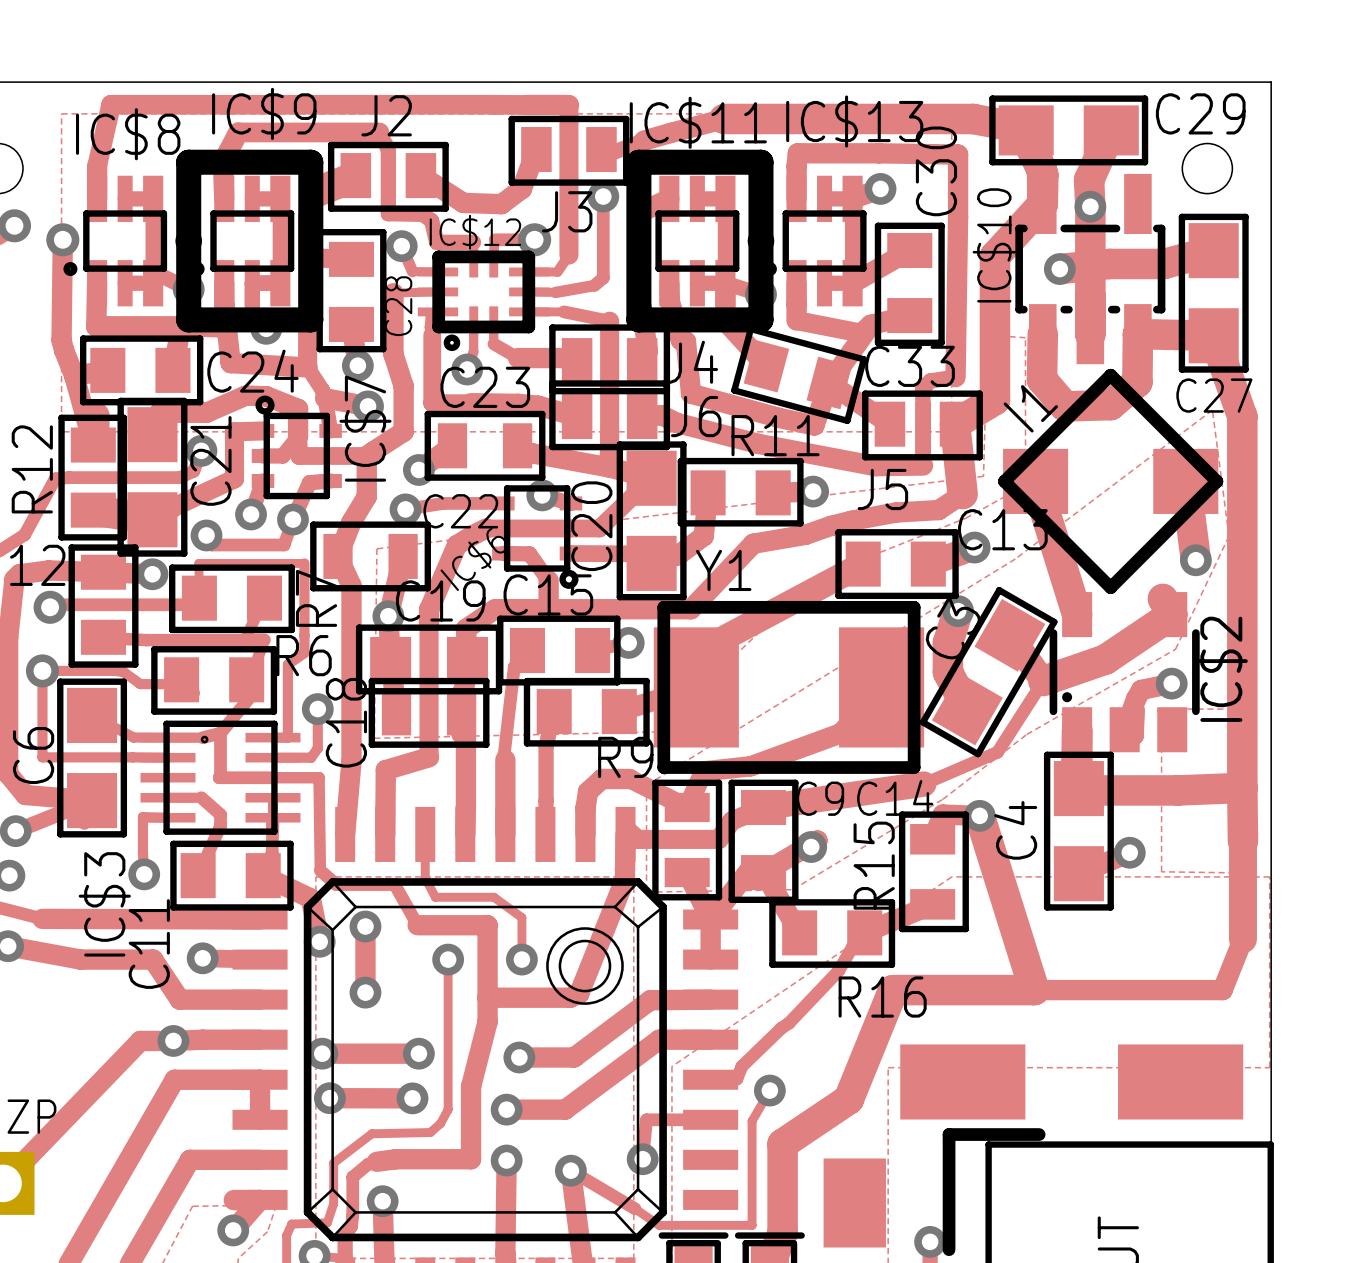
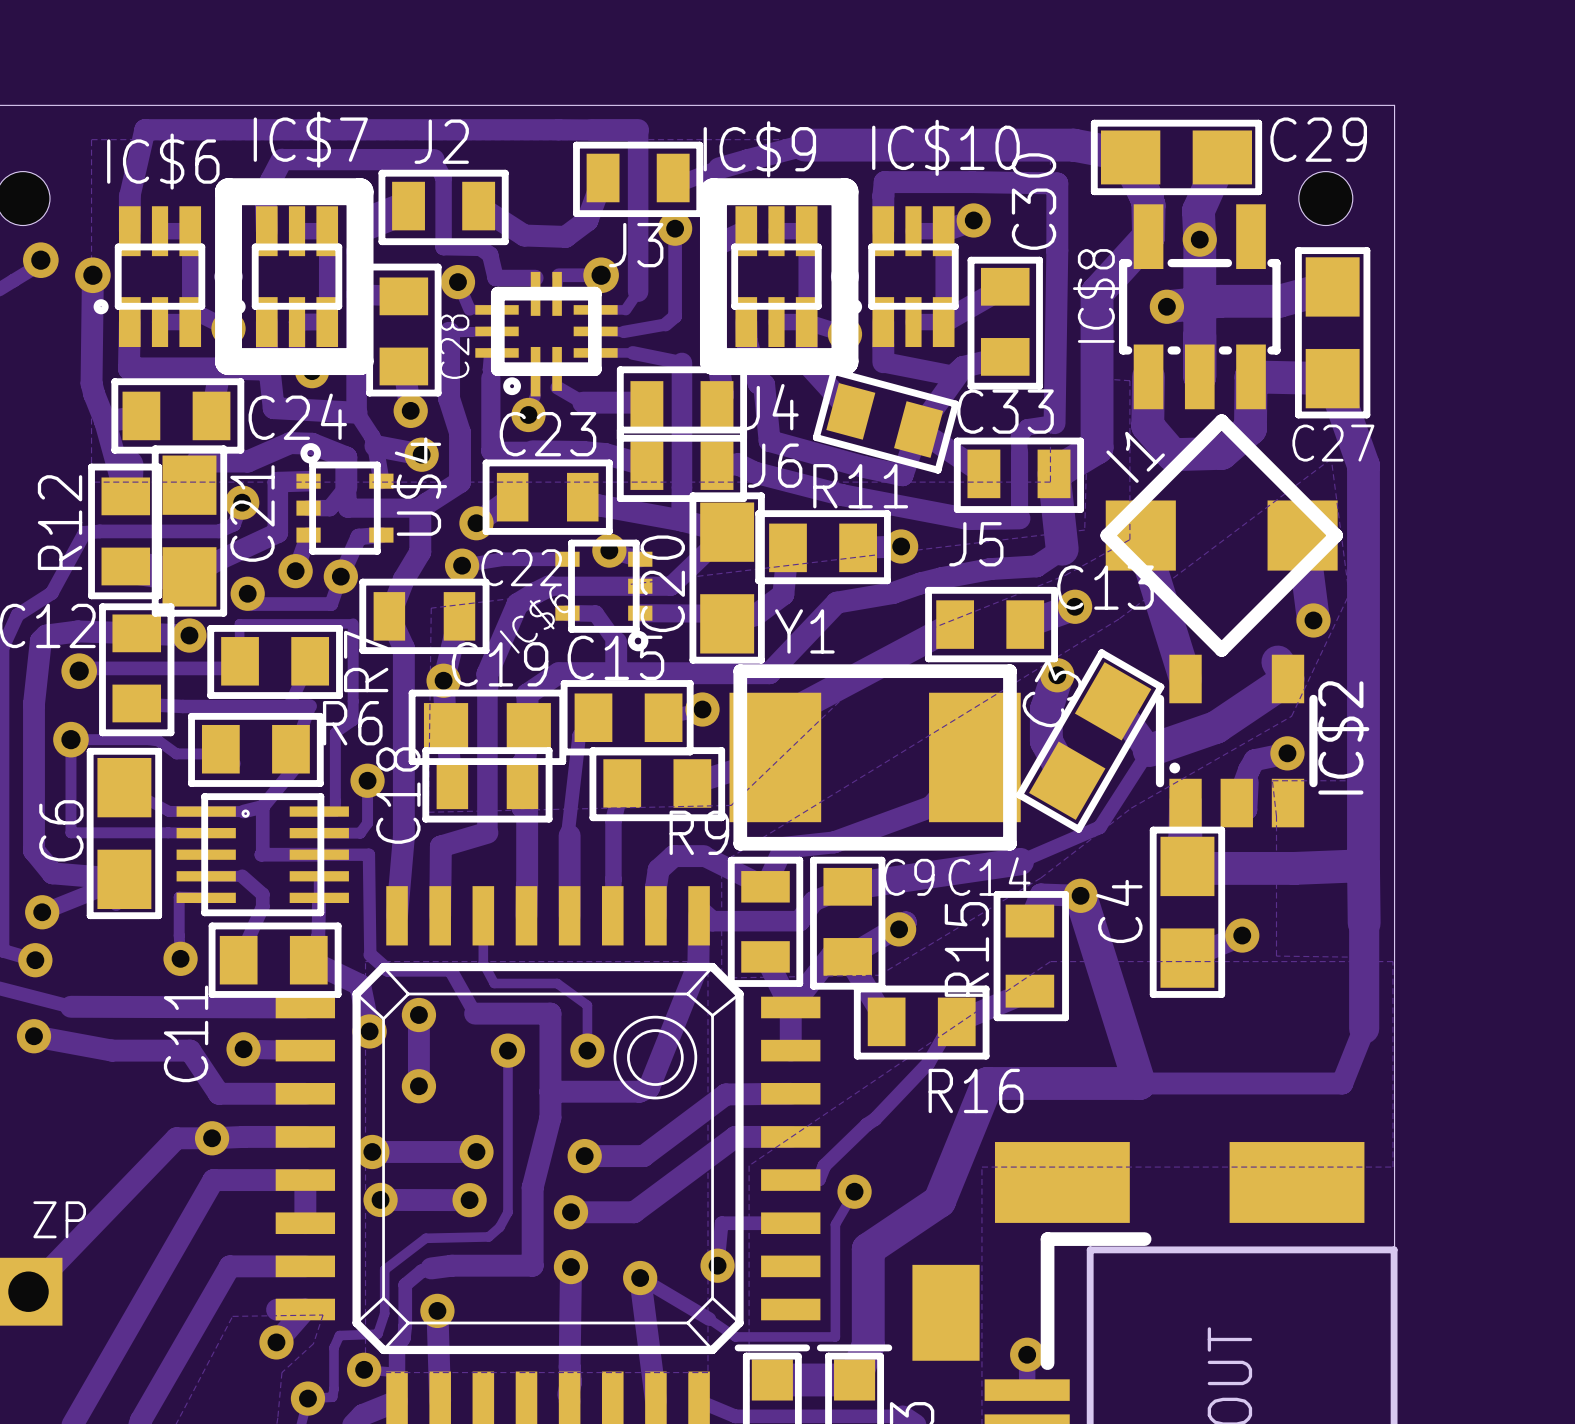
IC$9 name: IC$9 (264, 113) -> IC$7 (310, 139)
IC$13 name: IC$13 (854, 121) -> IC$10 (945, 147)
IC$11 name: IC$11 (698, 122) -> IC$9 (759, 149)
IC$8 name: IC$8 (128, 134) -> IC$6 (163, 161)
IC$12 name: IC$12 (475, 232) -> none
IC$10 name: IC$10 (994, 245) -> IC$8 (1096, 295)
IC$7 name: IC$7 (365, 428) -> U$4 (418, 486)
IC$3 name: IC$3 (104, 904) -> none

